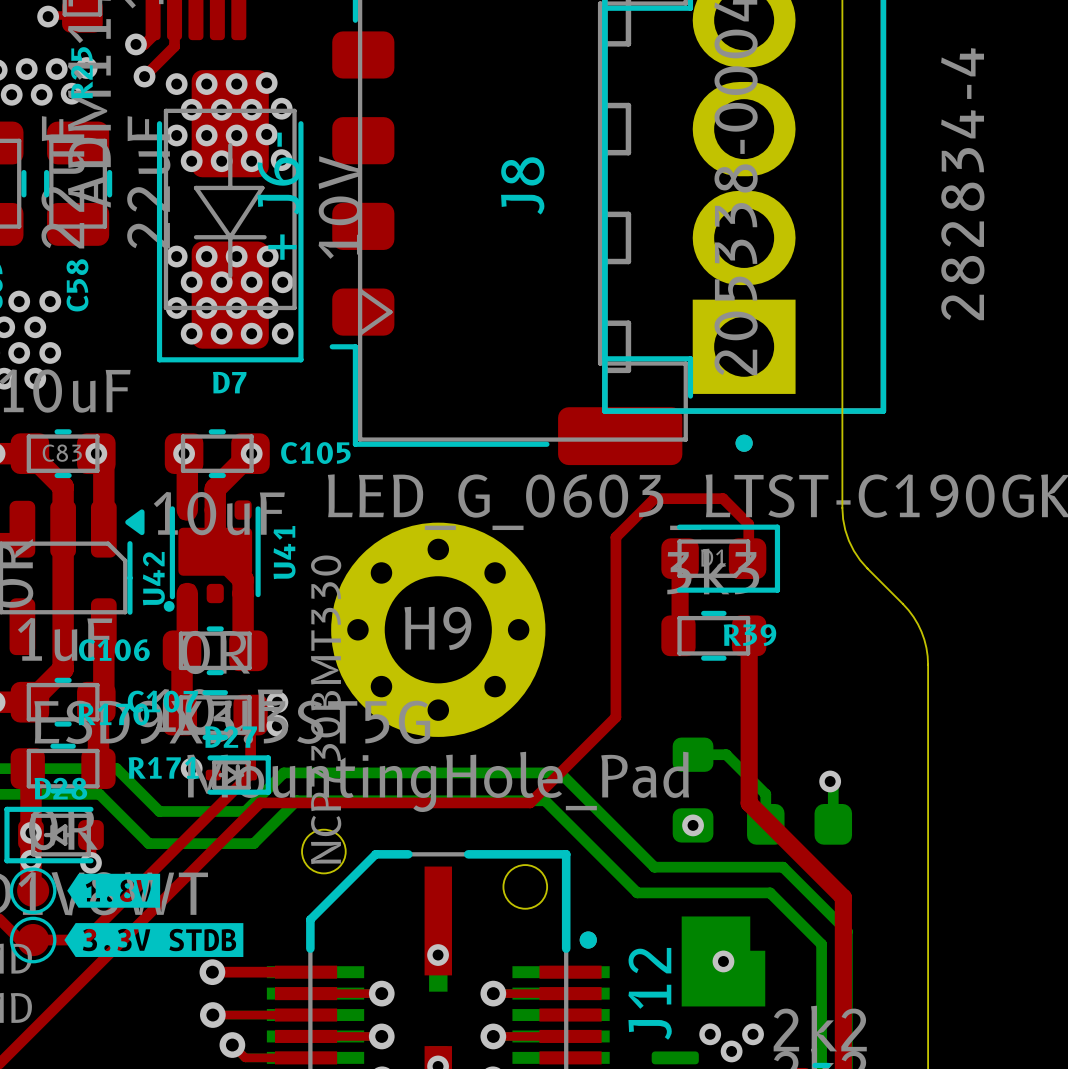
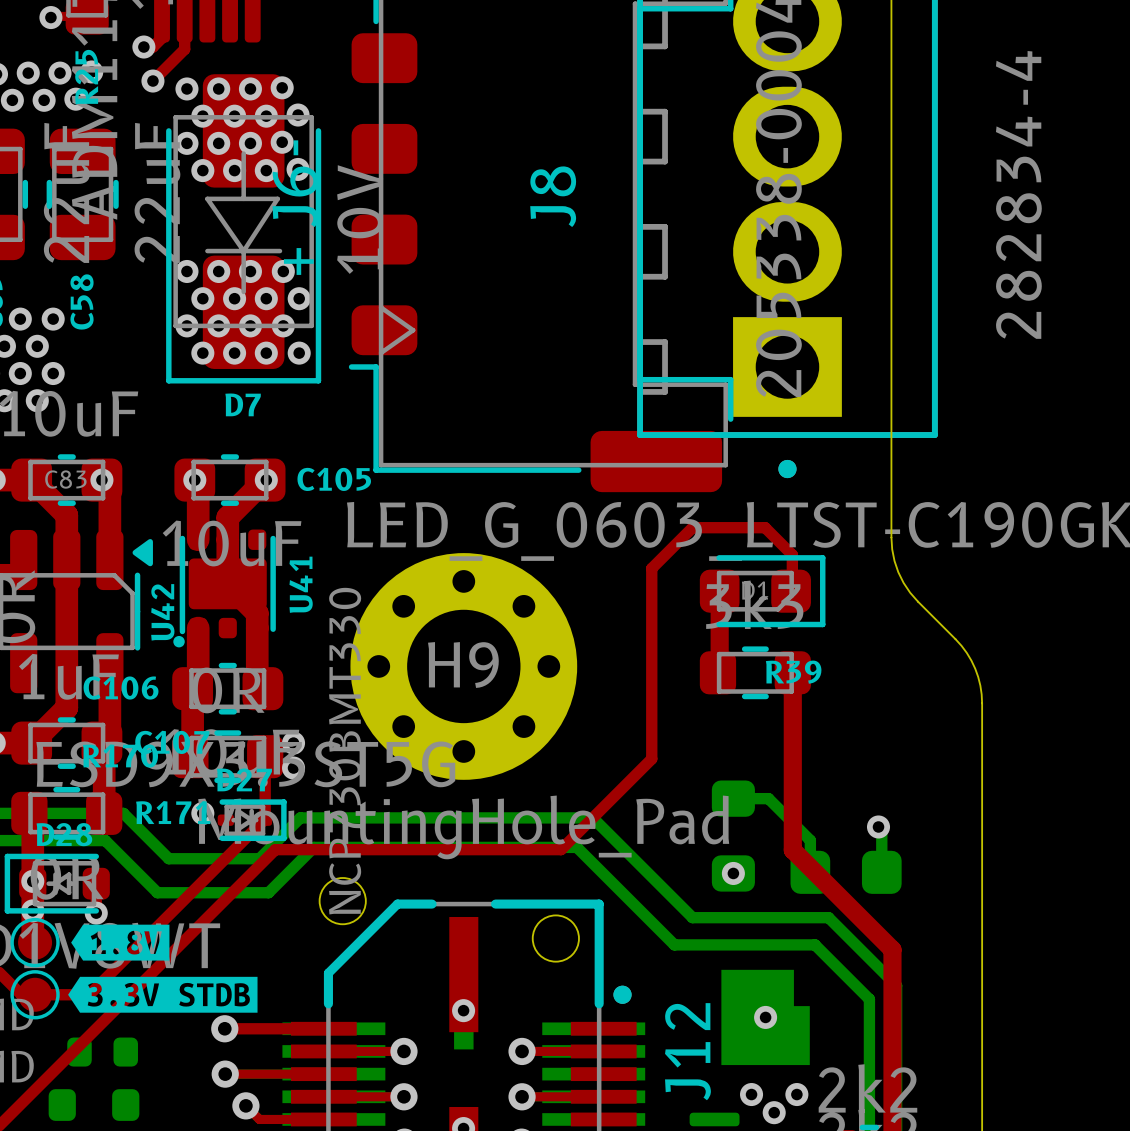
part: none -> (102, 1052)
part: none -> (94, 1105)

